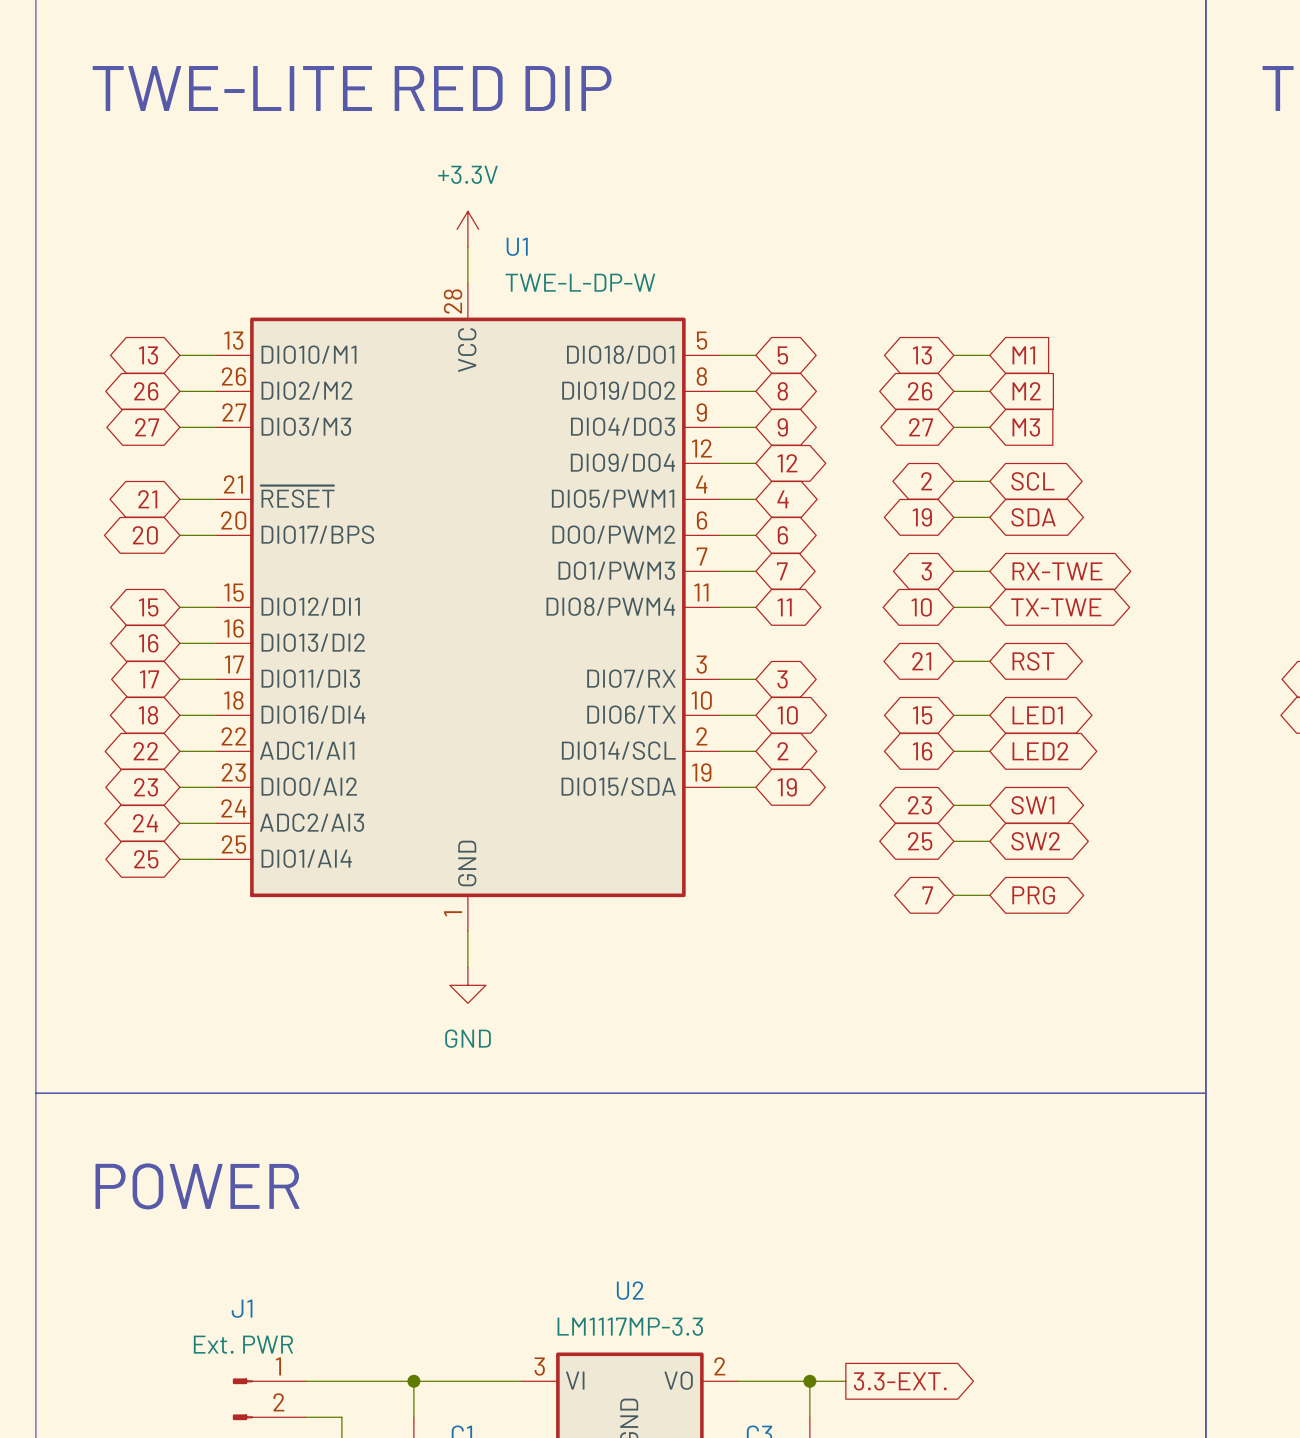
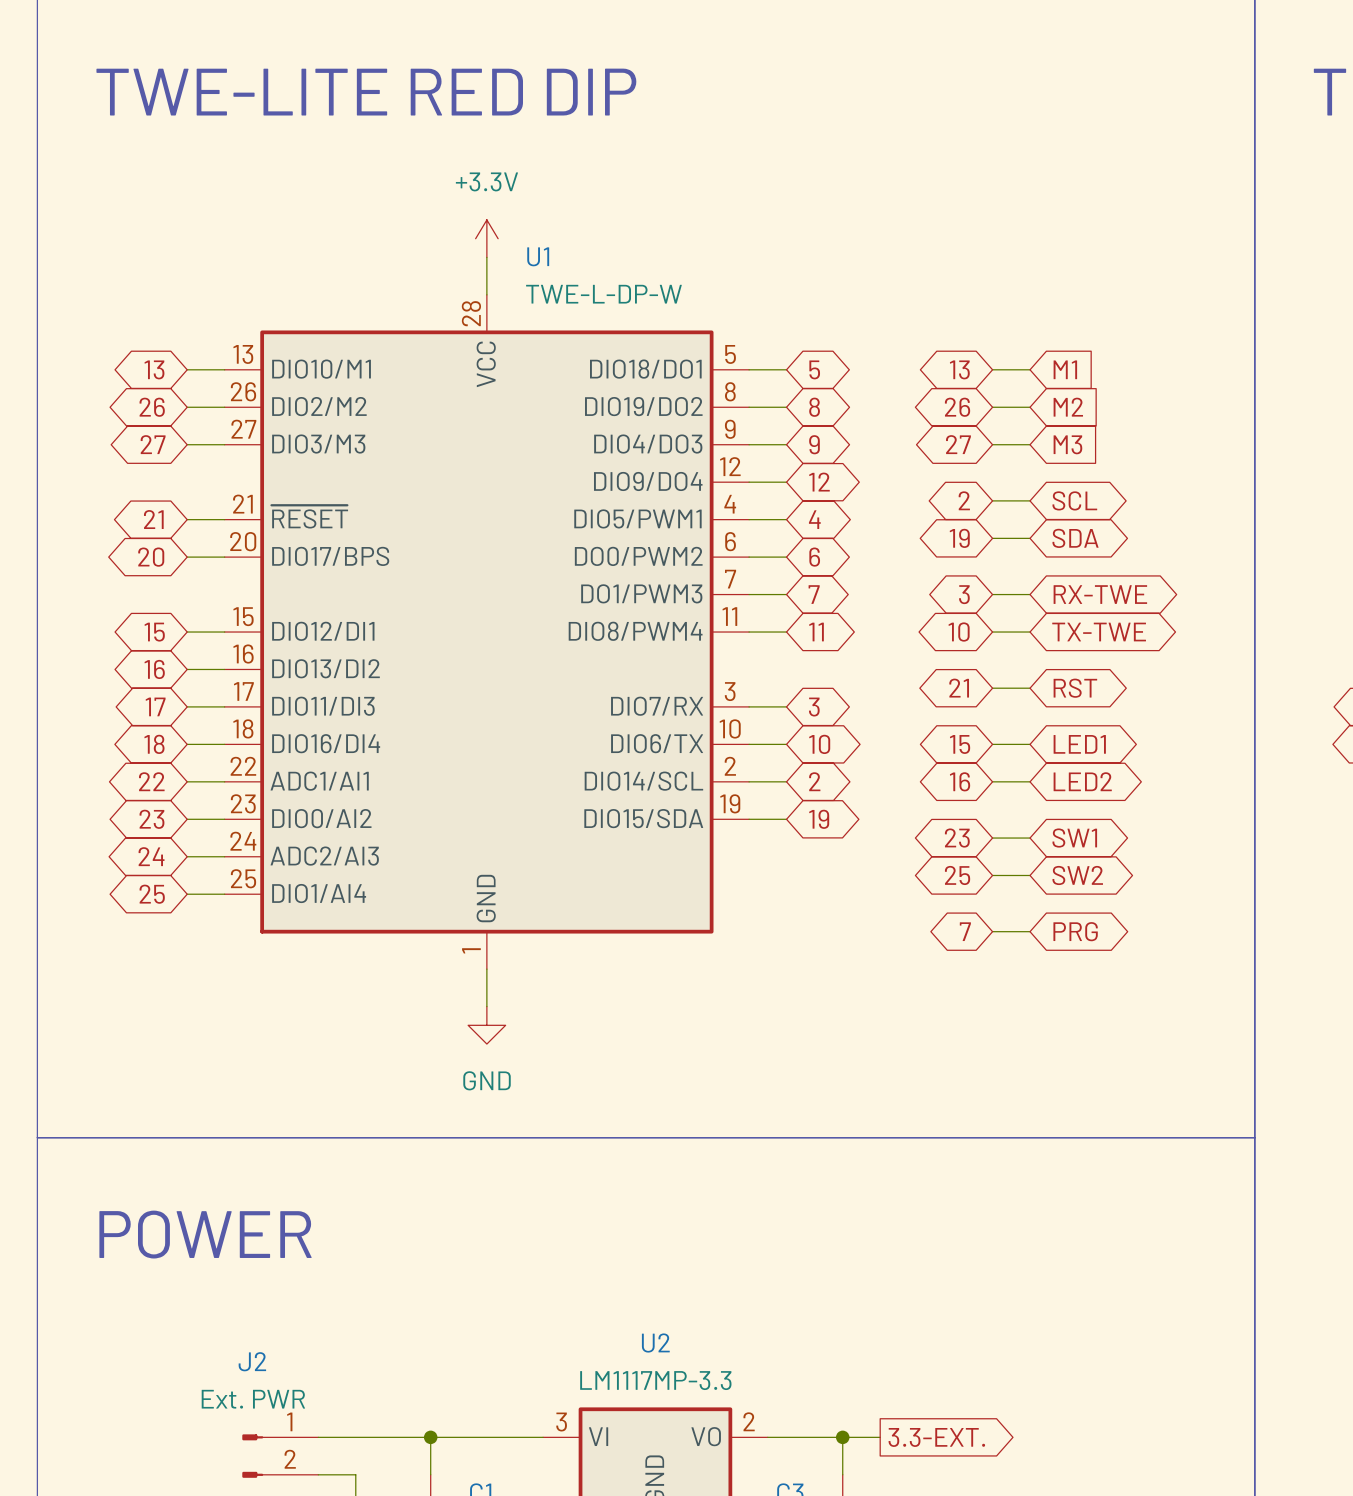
J1 name: J1 (242, 1308) -> J2 (252, 1361)

